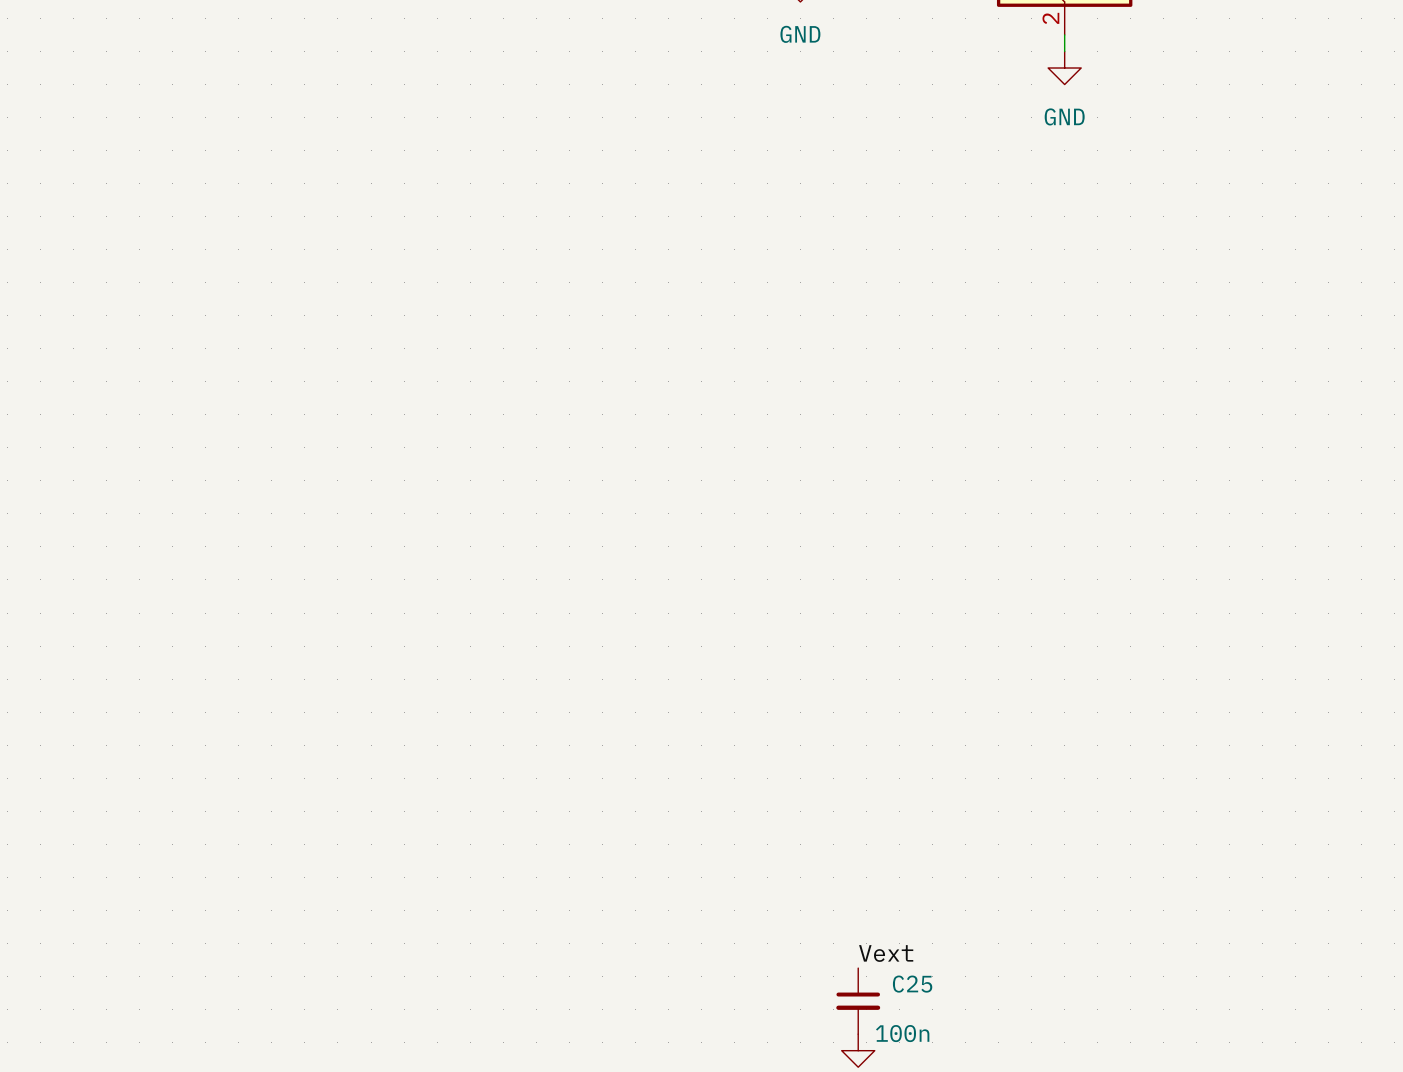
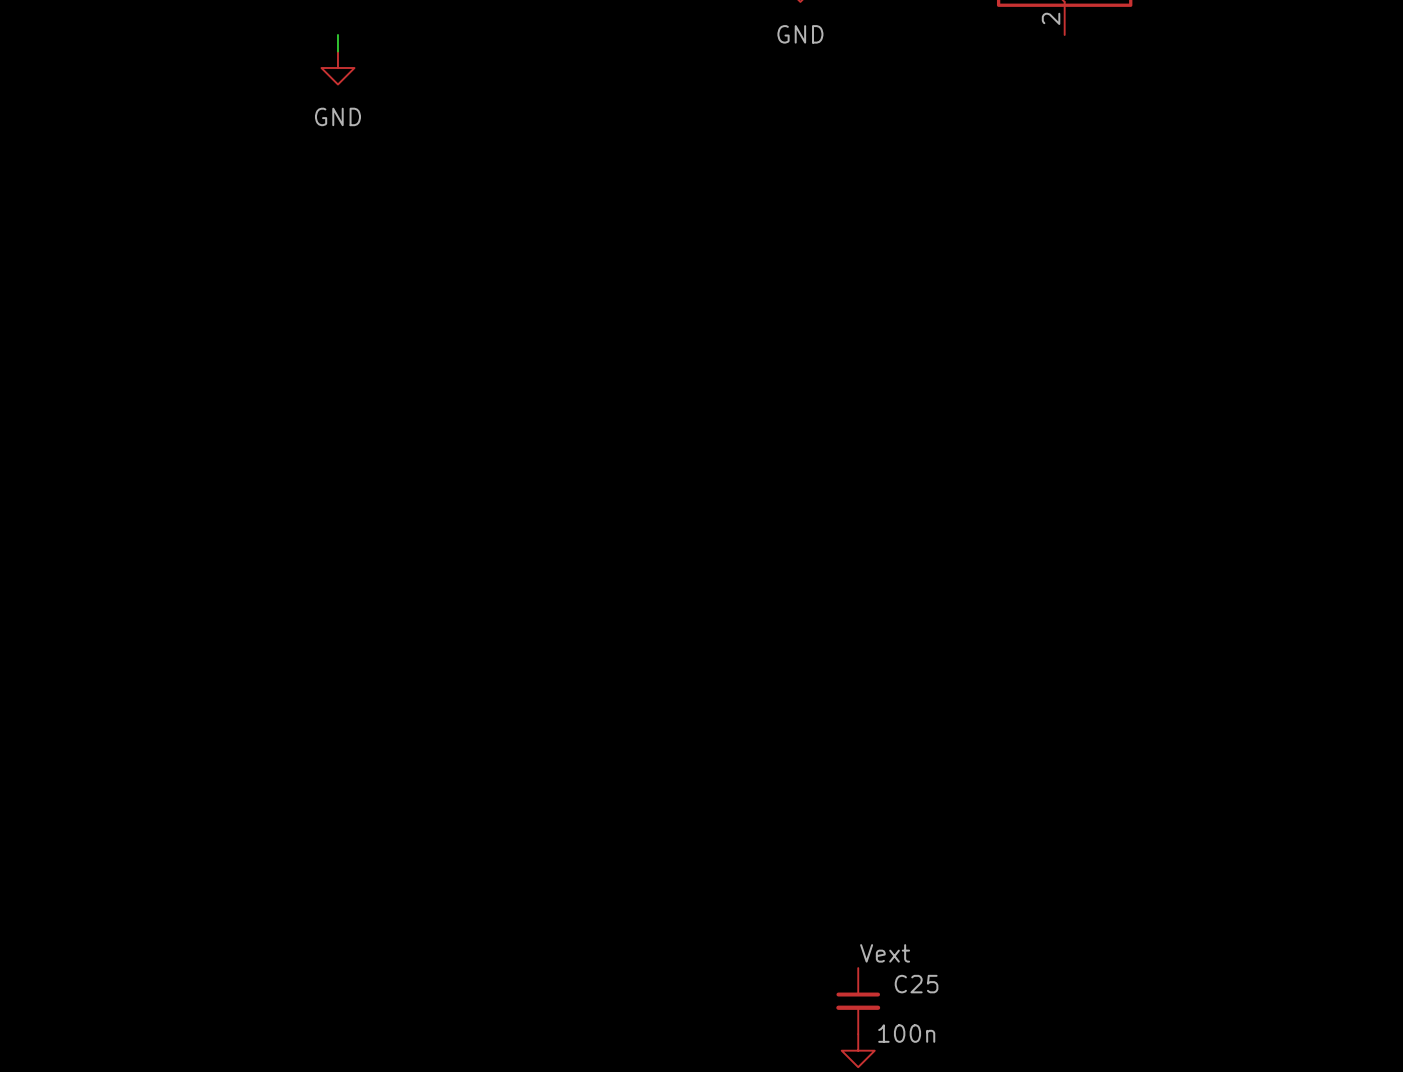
wire: none -> (337, 34) (337, 51)
wire: (1064, 34) (1064, 51) -> none
power symbol: none -> GND (337, 68)
power symbol: GND (1064, 68) -> none

